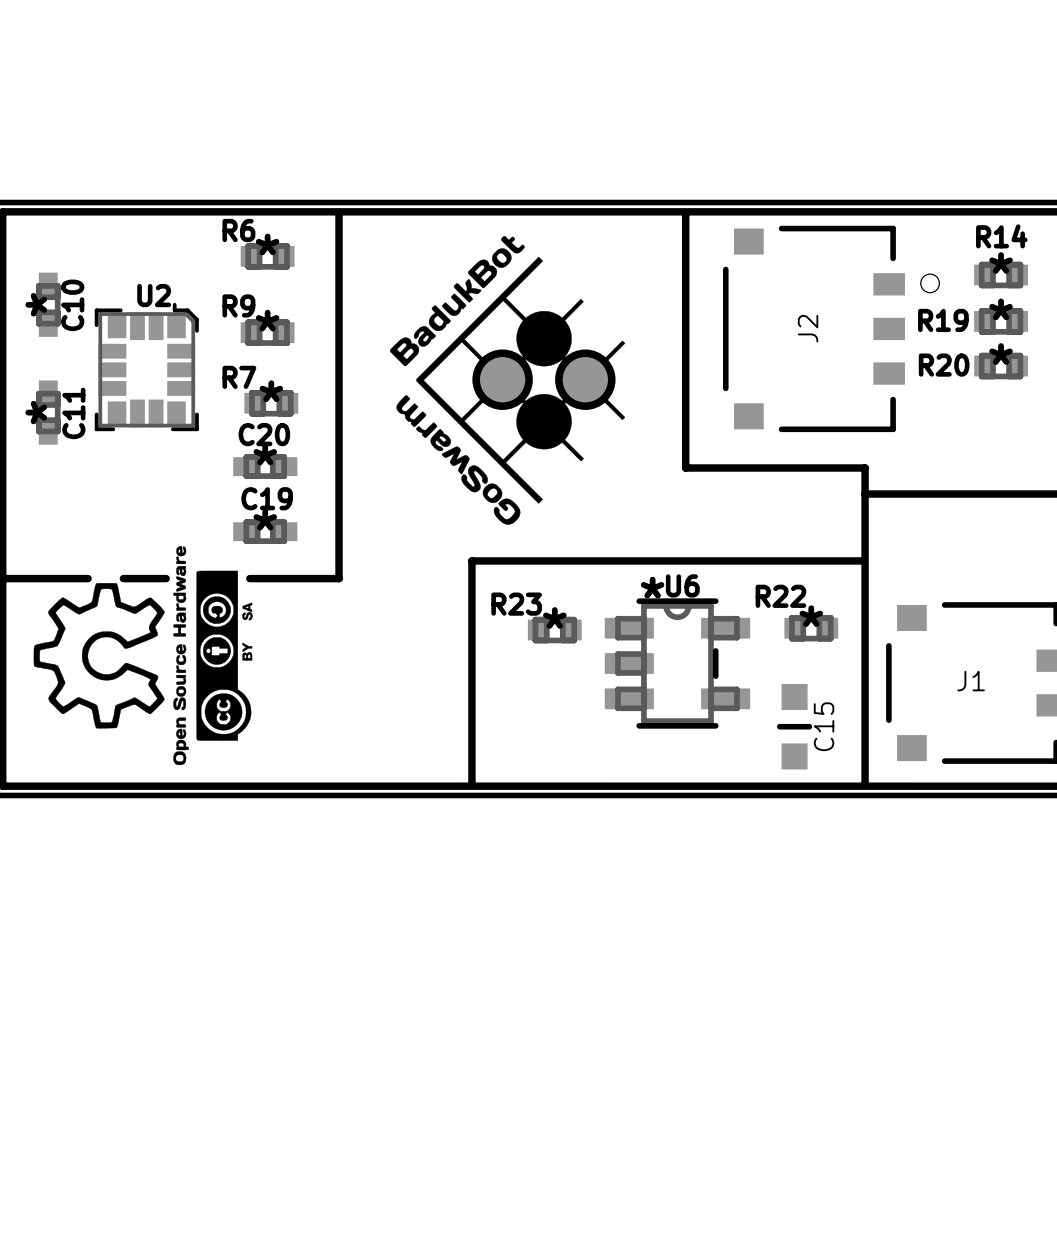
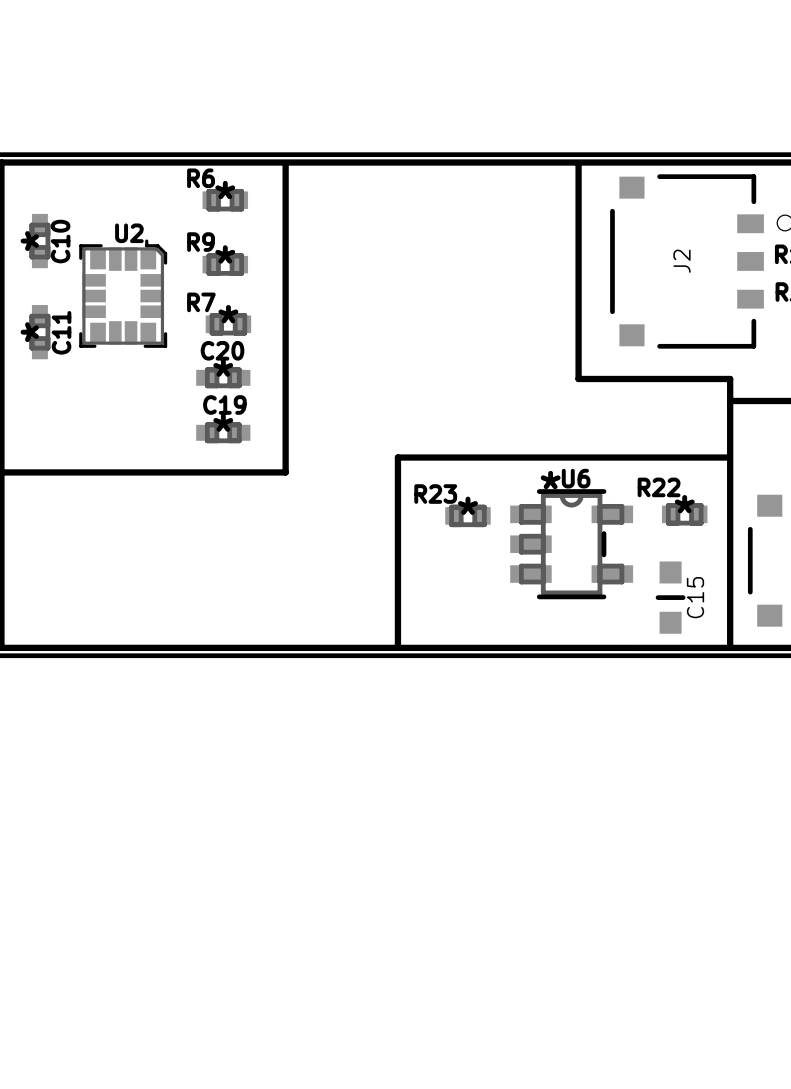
drawing: [390, 236, 626, 525] -> none
part: (502, 379) -> none
part: (585, 379) -> none
drawing: [33, 546, 253, 766] -> none
line: none -> (73, 472) (103, 472)
line: none -> (139, 472) (210, 472)

